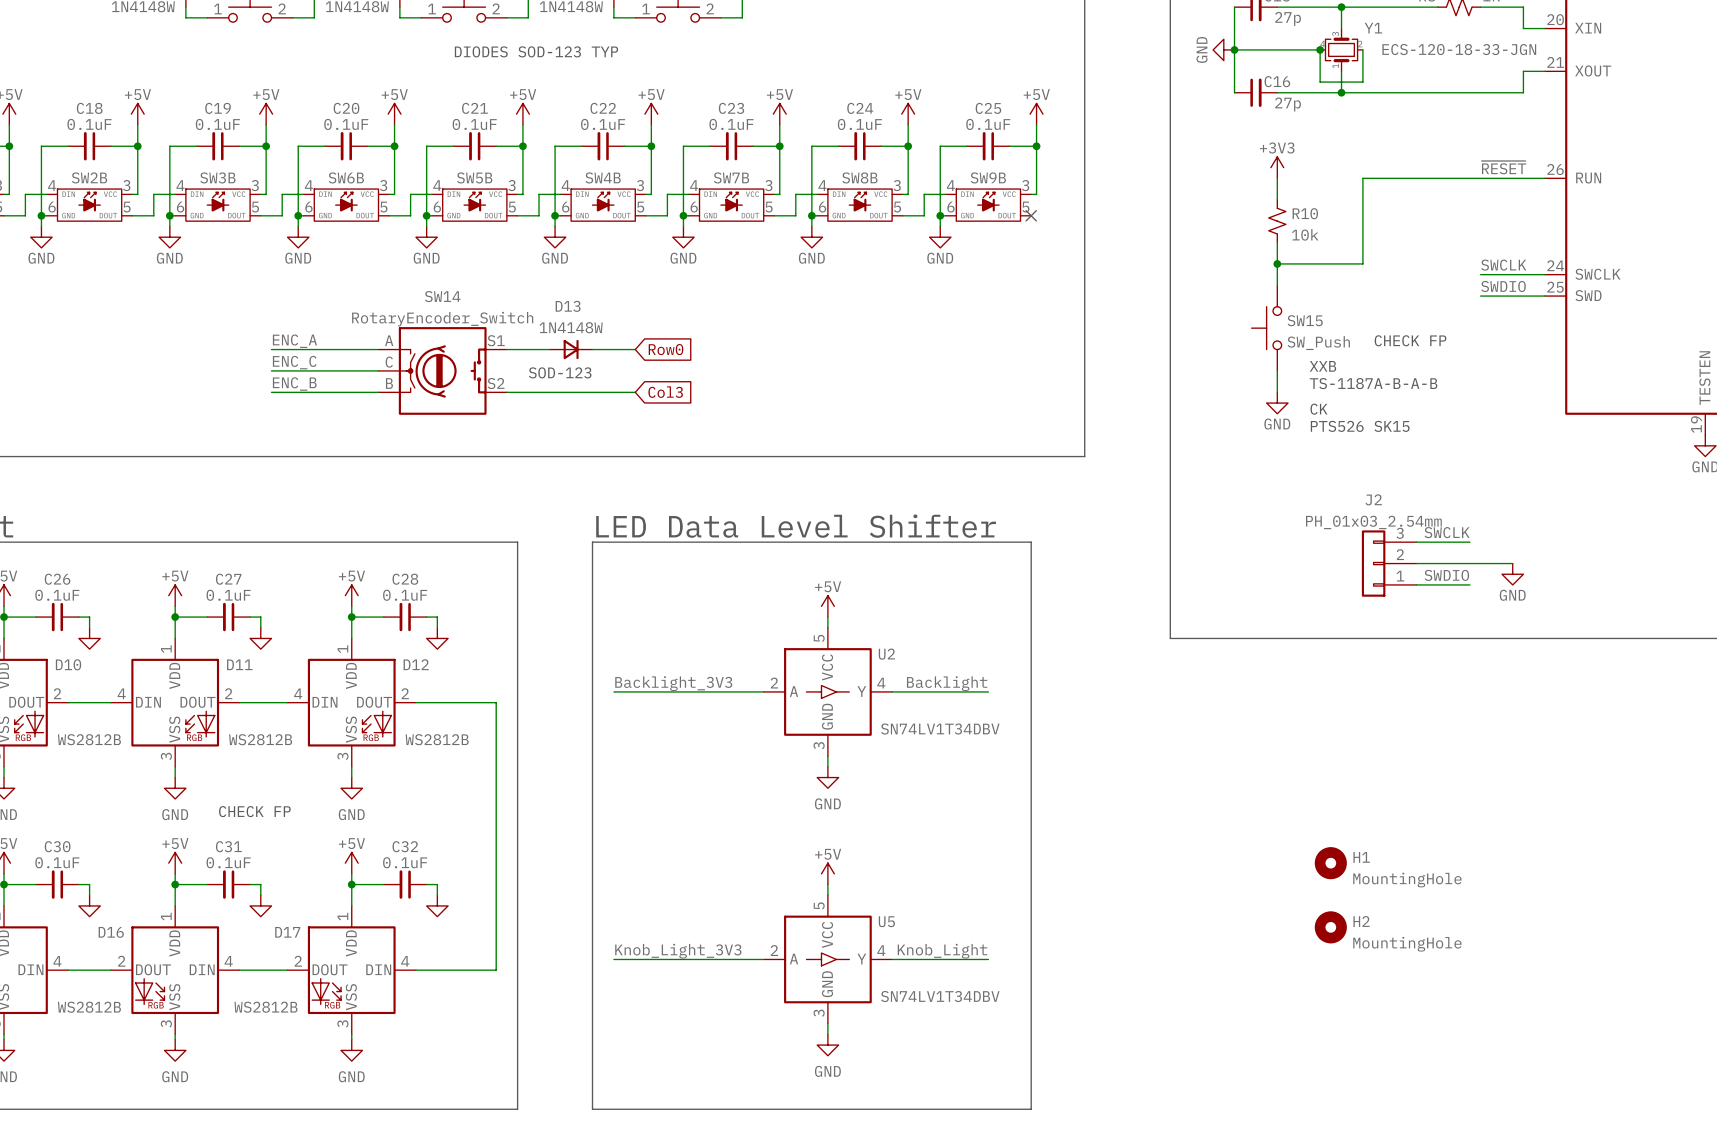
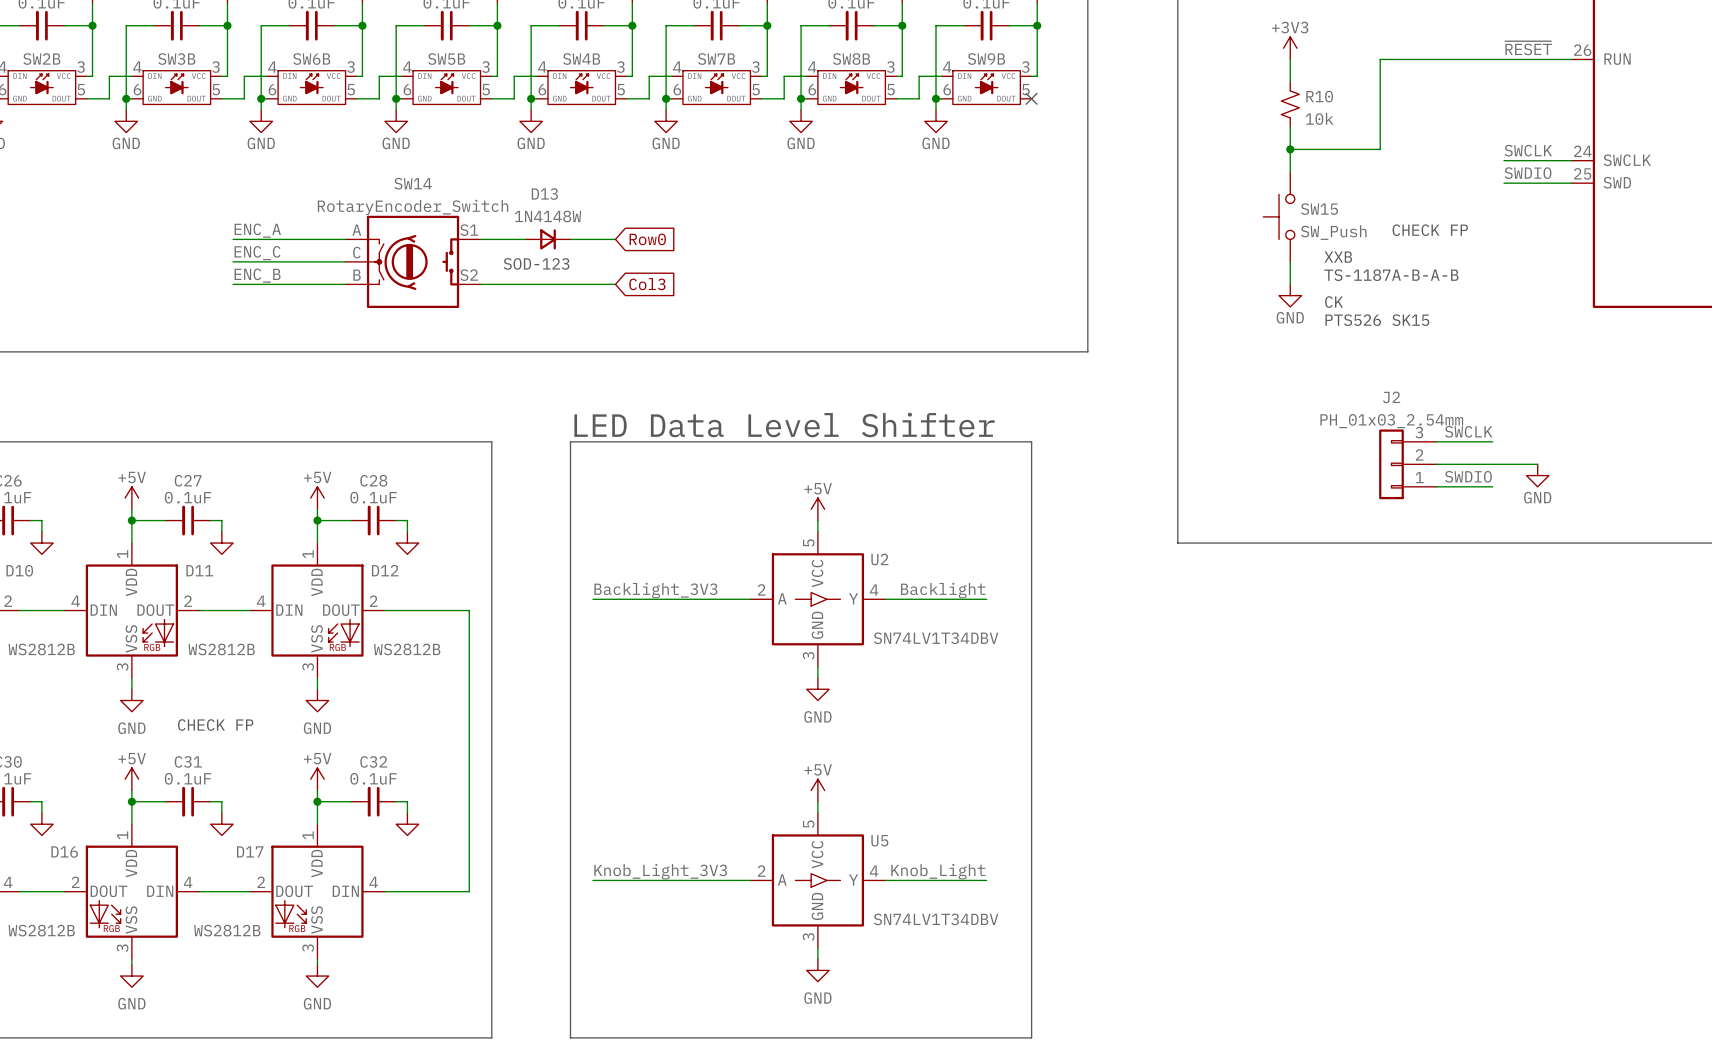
H1: MountingHole (1330, 863) -> none
H2: MountingHole (1330, 927) -> none

